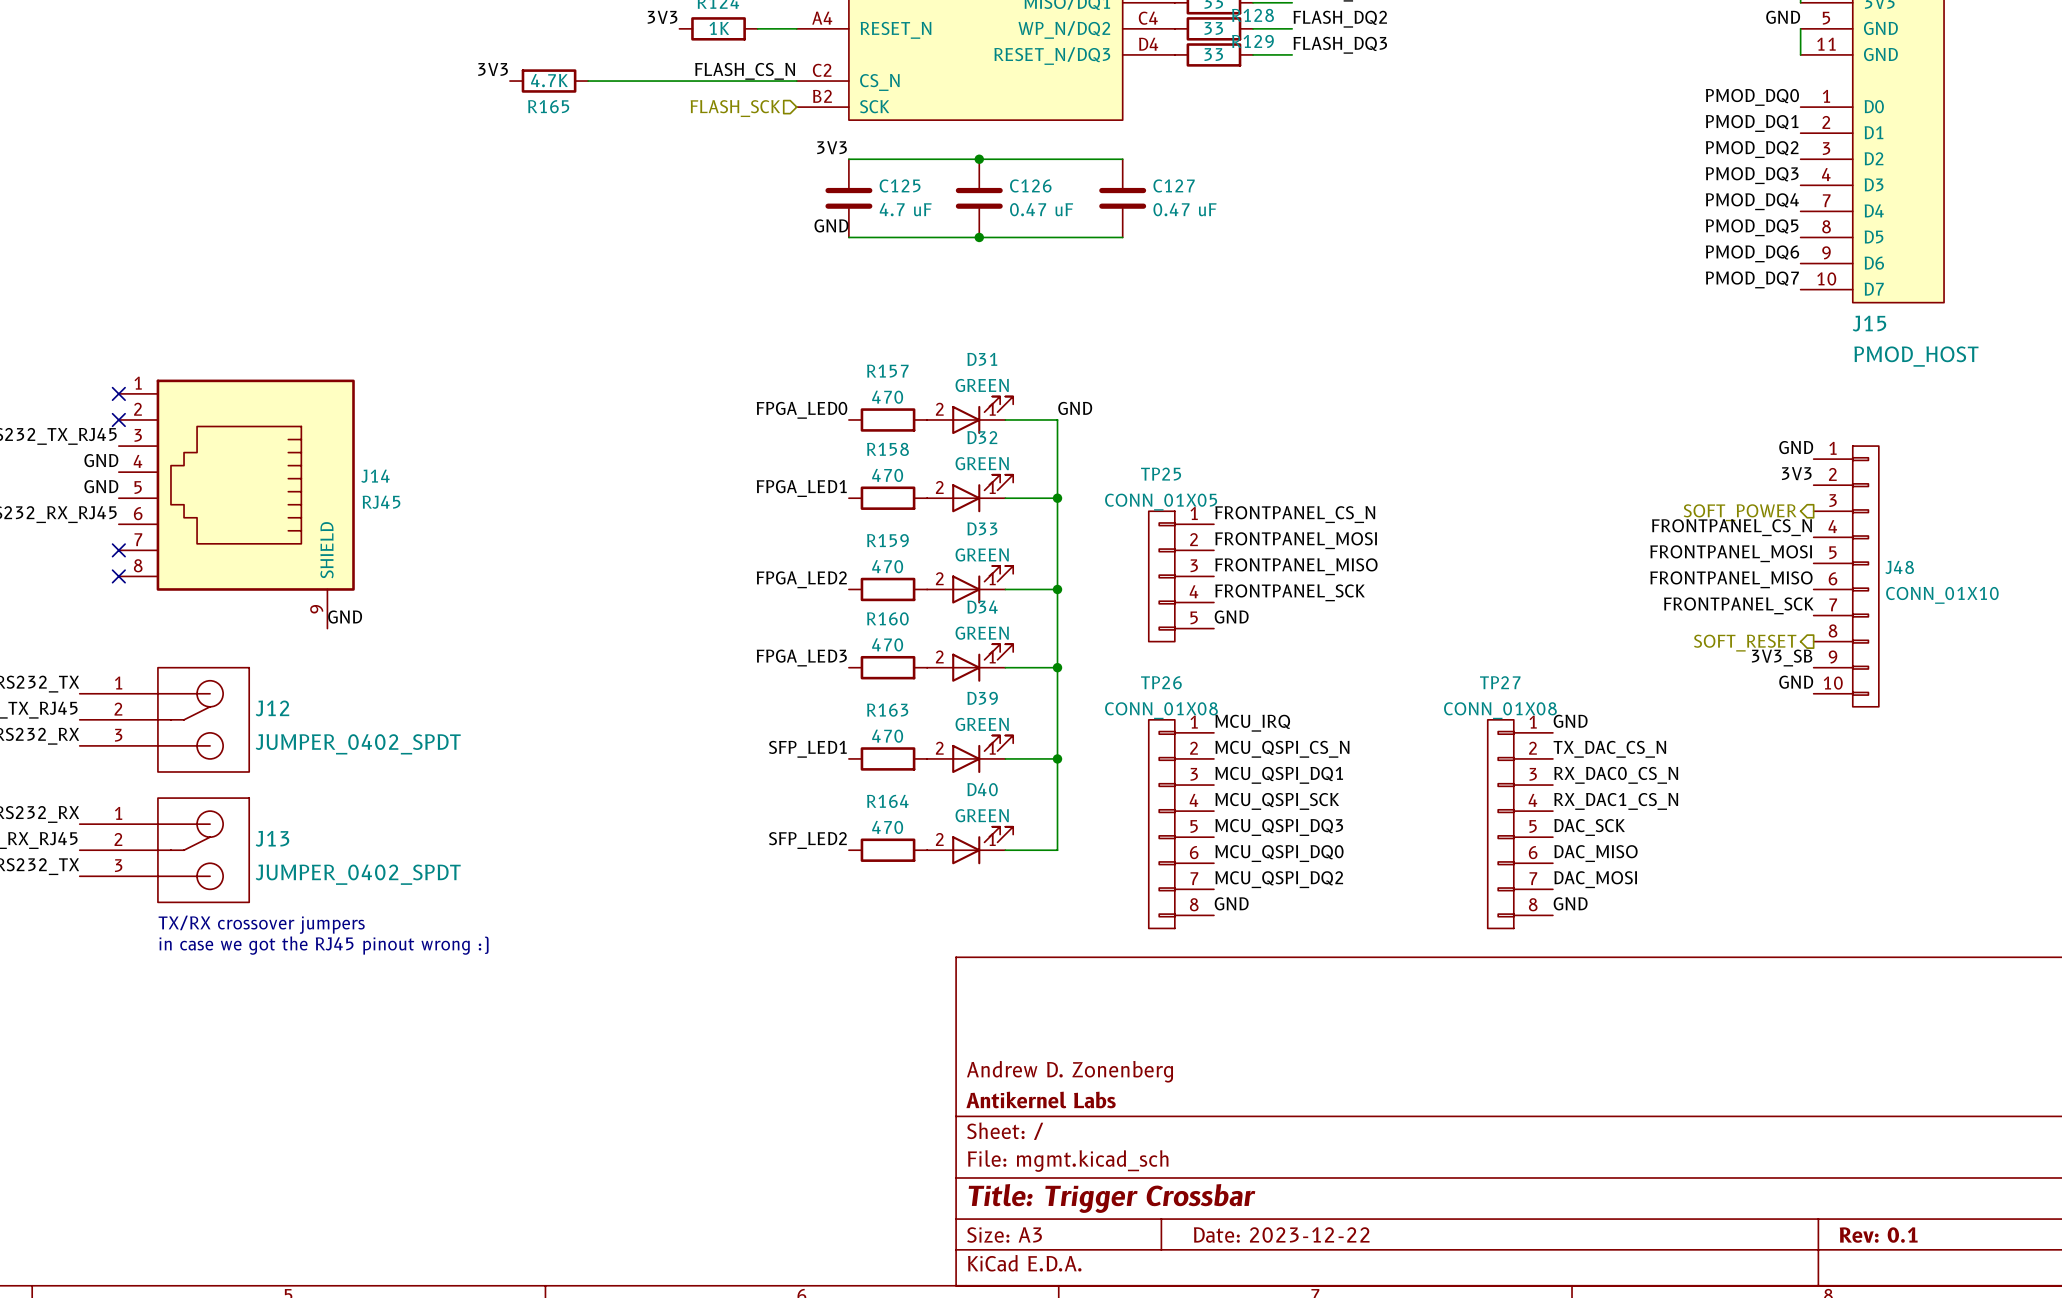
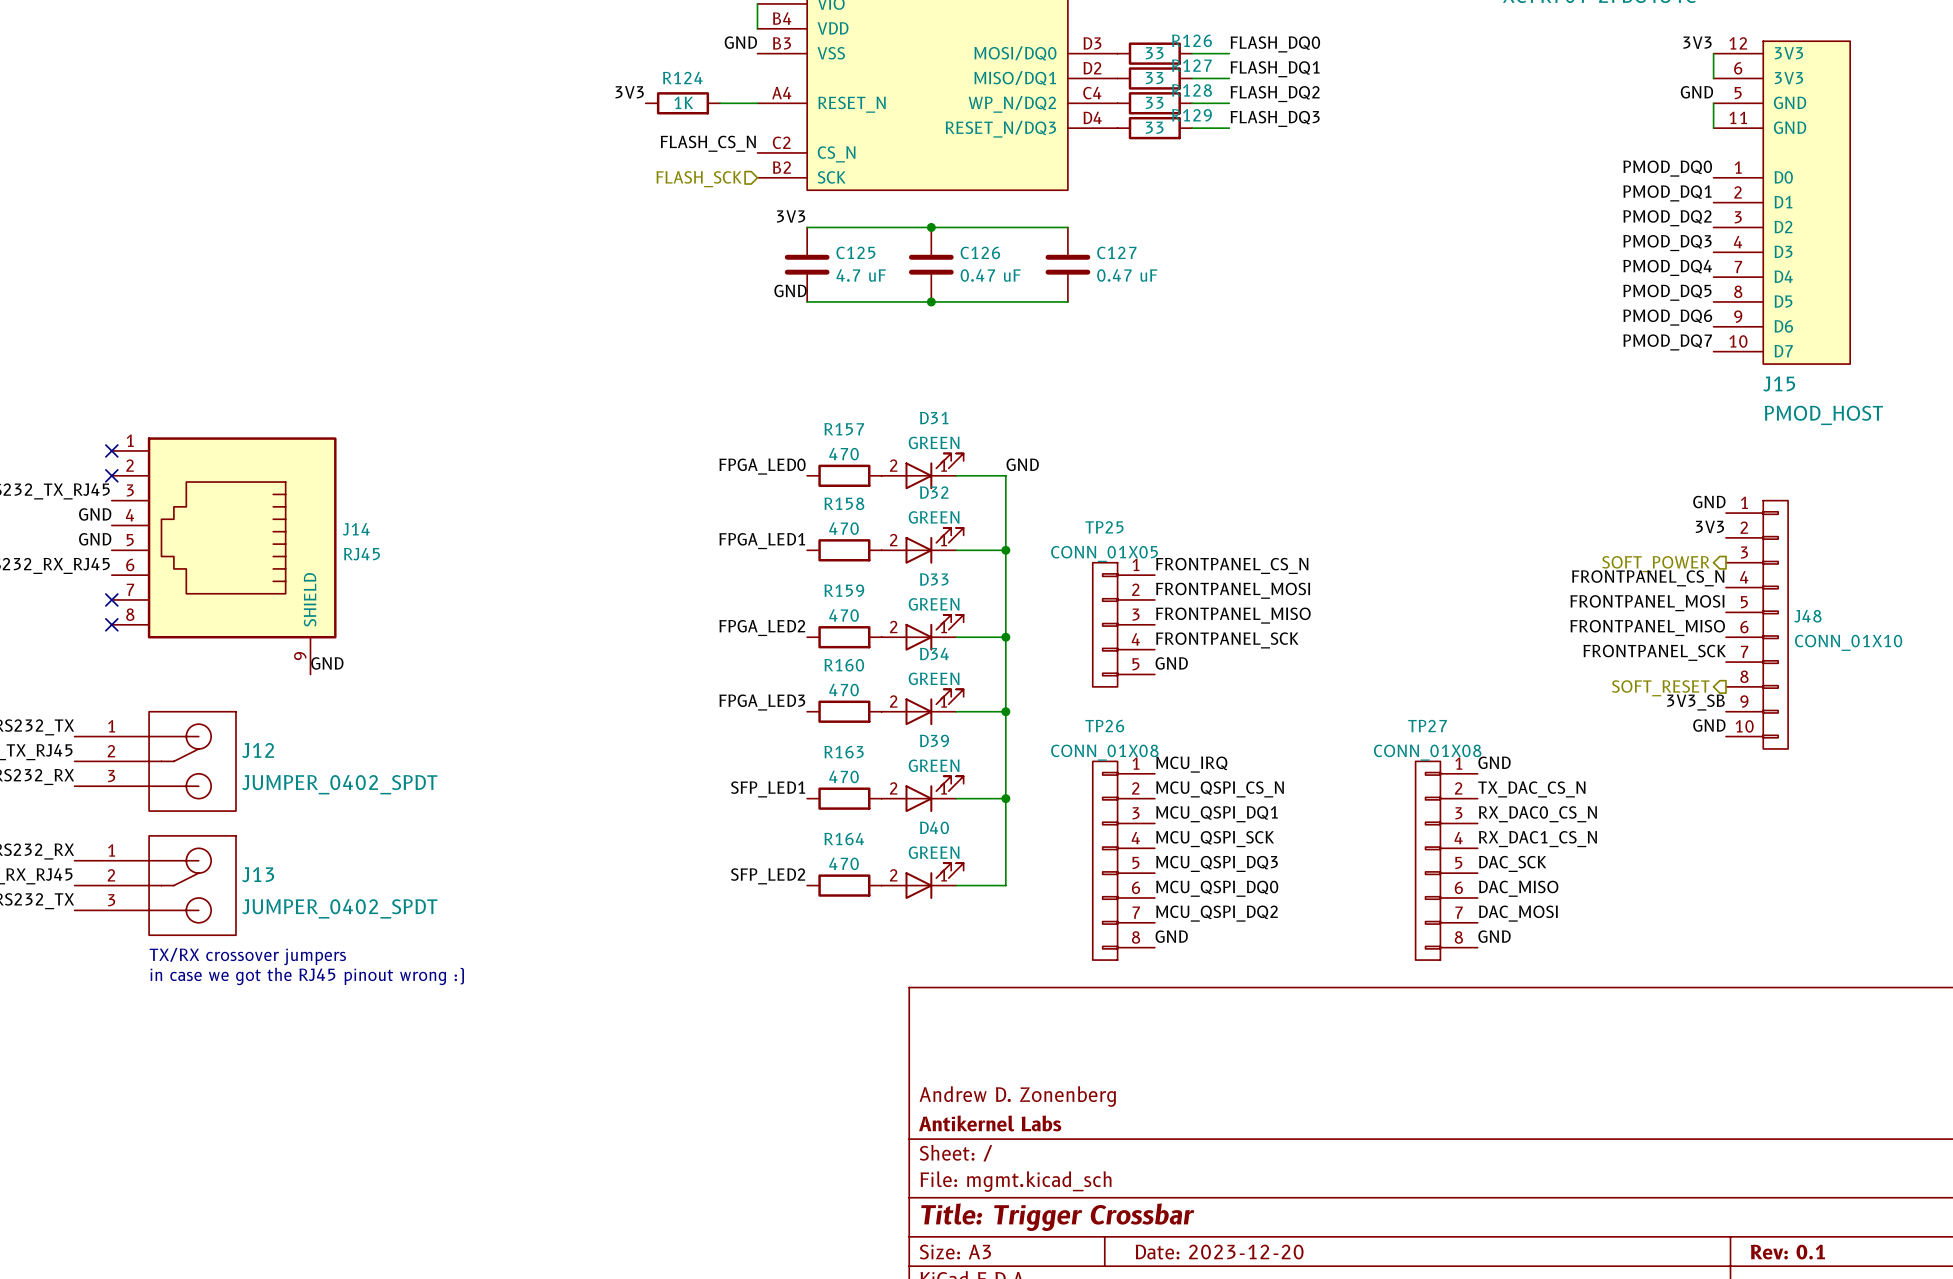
label: 3V3 (493, 69) -> none
R165: 4.7K (549, 81) -> none
wire: (588, 81) (796, 81) -> none
title block: Date: 2023-12-22 (1281, 1234) -> Date: 2023-12-20 (1219, 1252)

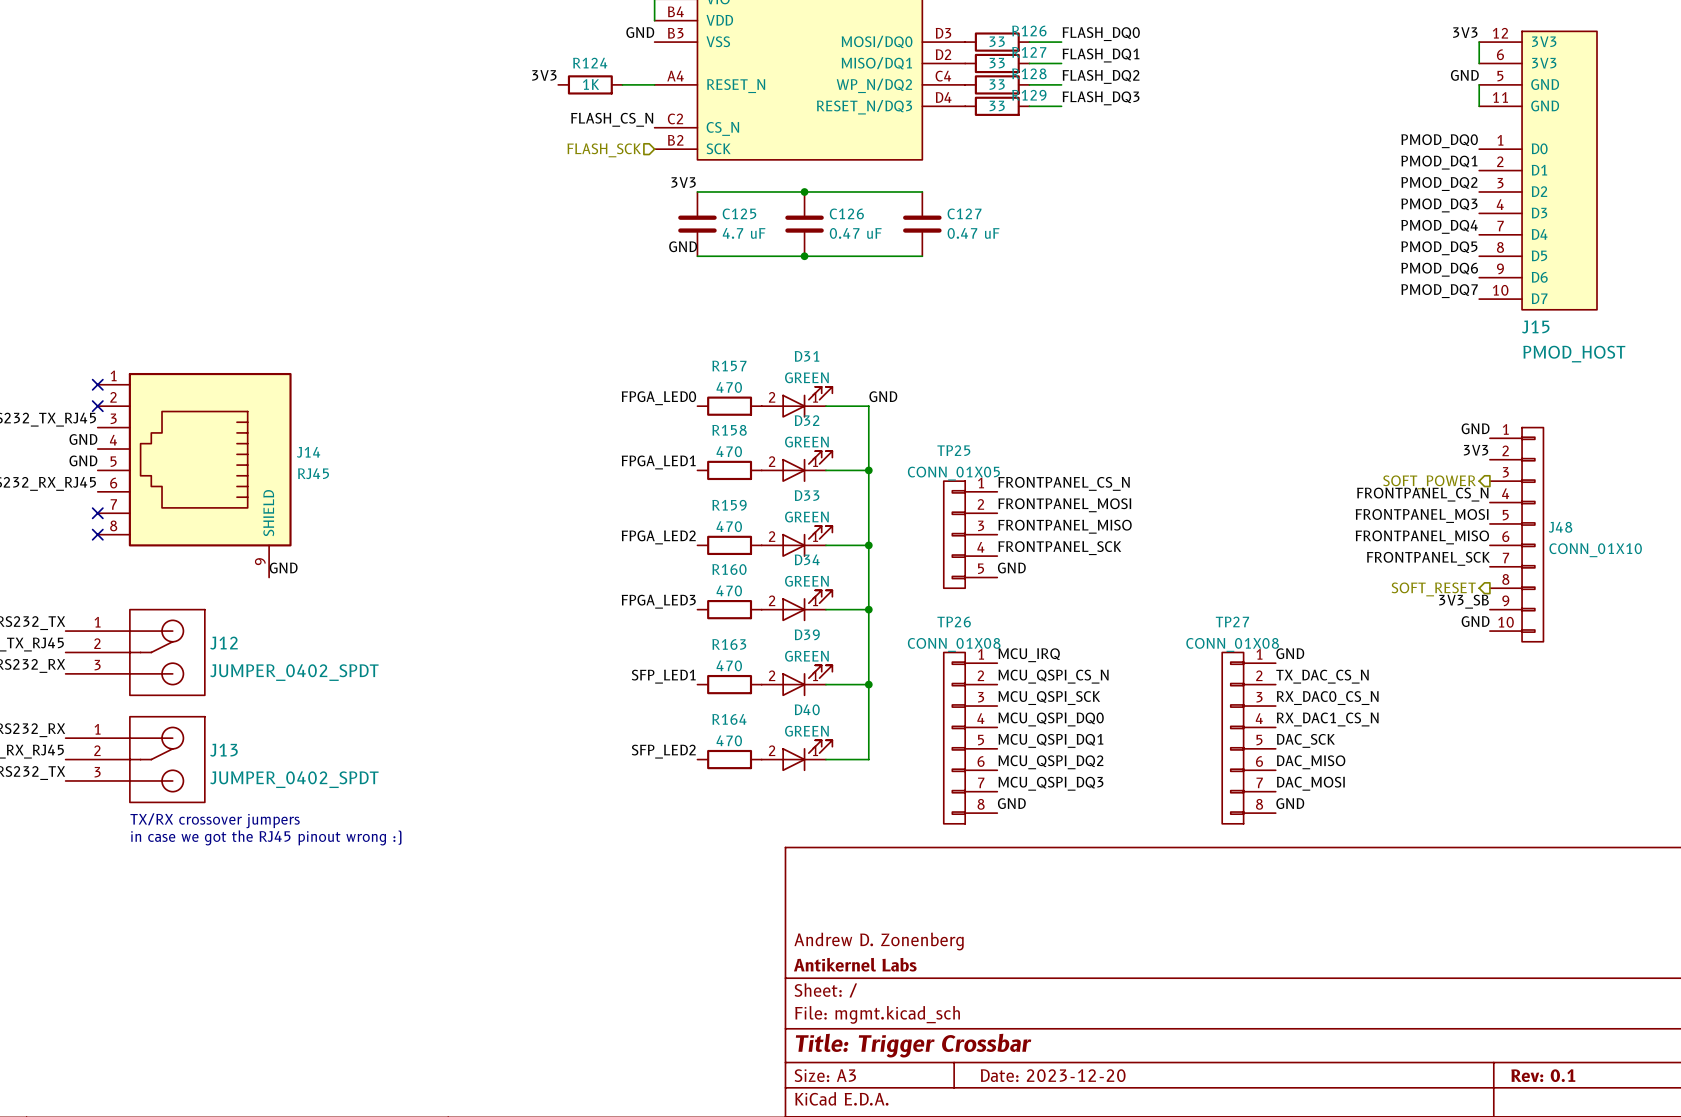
label: MCU_QSPI_DQ1 (1217, 814) -> MCU_QSPI_SCK (1049, 698)
label: MCU_QSPI_SCK (1215, 839) -> MCU_QSPI_DQ0 (1051, 719)
label: MCU_QSPI_DQ3 (1217, 863) -> MCU_QSPI_DQ1 (1050, 740)
label: MCU_QSPI_DQ0 (1217, 888) -> MCU_QSPI_DQ2 (1050, 762)
label: MCU_QSPI_DQ2 (1217, 913) -> MCU_QSPI_DQ3 (1050, 783)

